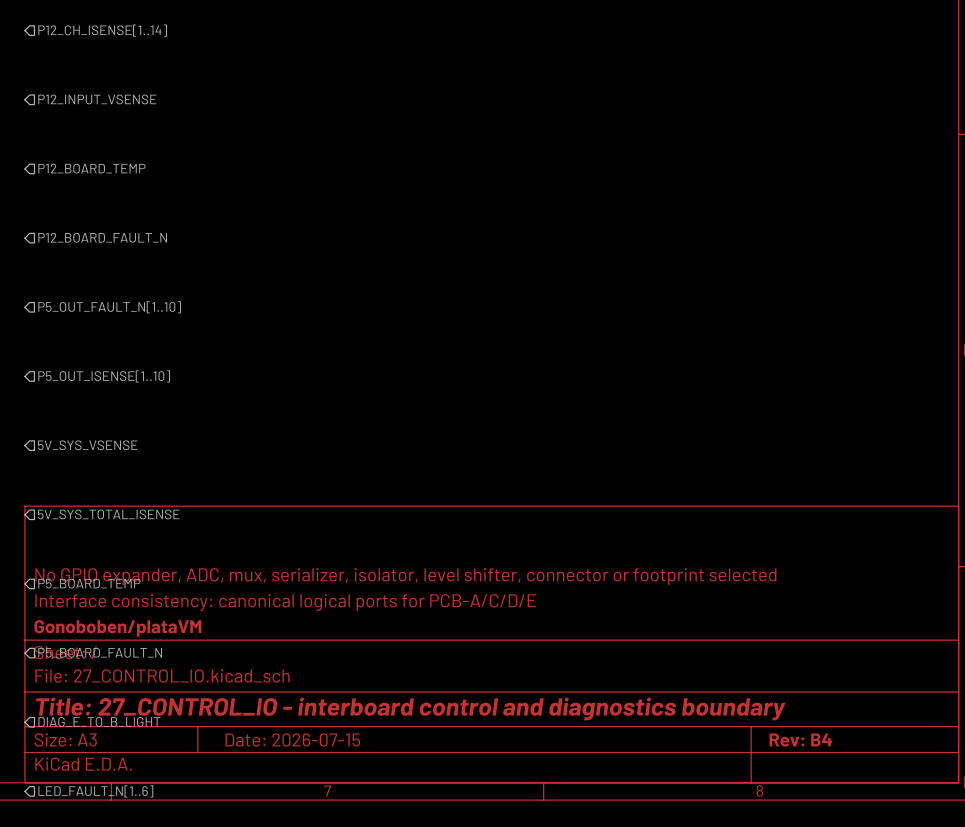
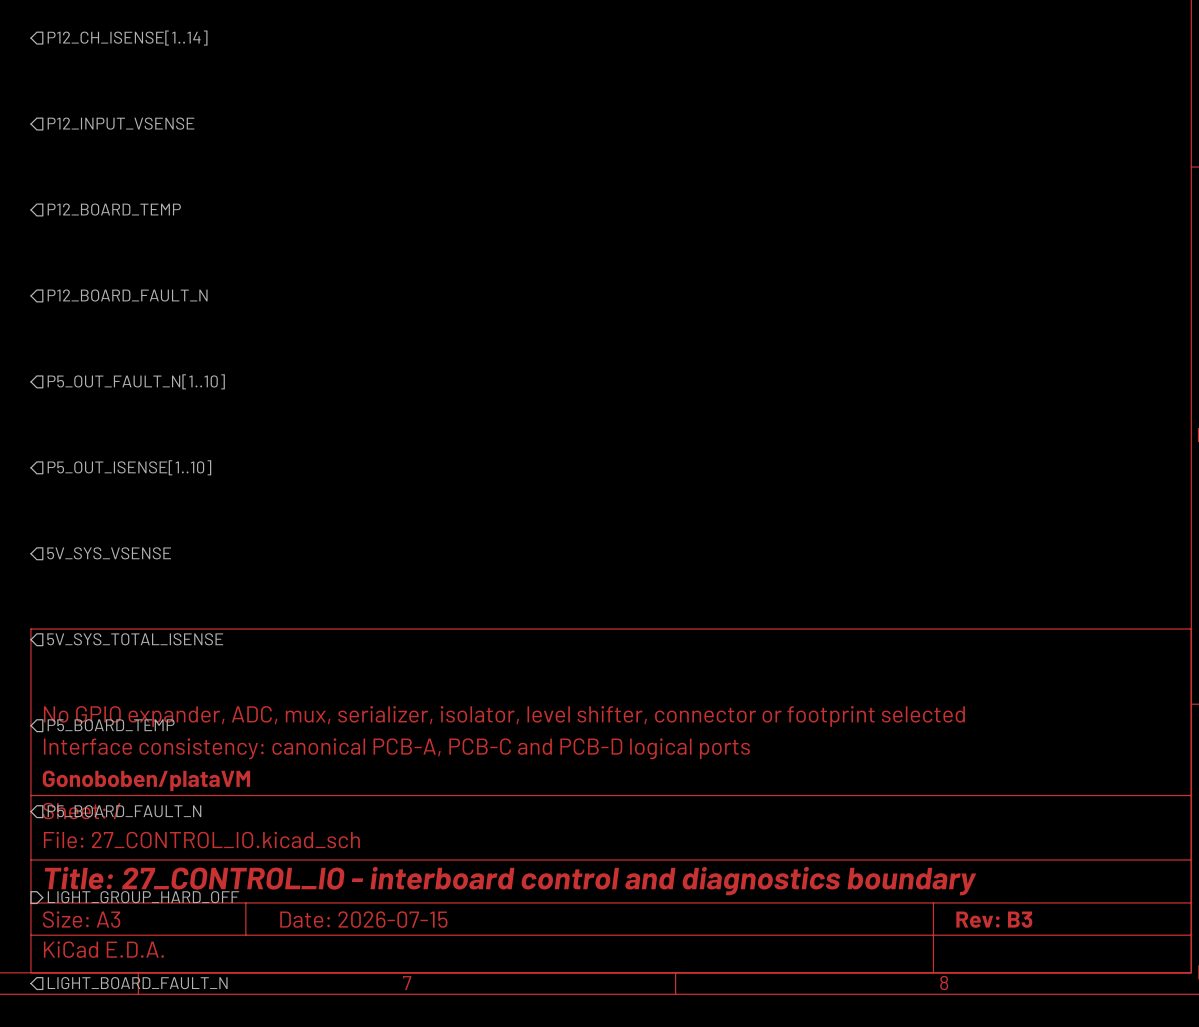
title block: Interface consistency: canonical logical ports for PCB-A/C/D/E (285, 602) -> Interface consistency: canonical PCB-A, PCB-C and PCB-D logical ports (396, 748)
hierarchical label shape: input (99, 721) -> output (143, 897)
hierarchical label: DIAG_E_TO_B_LIGHT (99, 721) -> LIGHT_GROUP_HARD_OFF (143, 897)
title block: Rev: B4 (800, 740) -> Rev: B3 (994, 919)
hierarchical label: LED_FAULT_N[1..6] (95, 791) -> LIGHT_BOARD_FAULT_N (137, 983)

